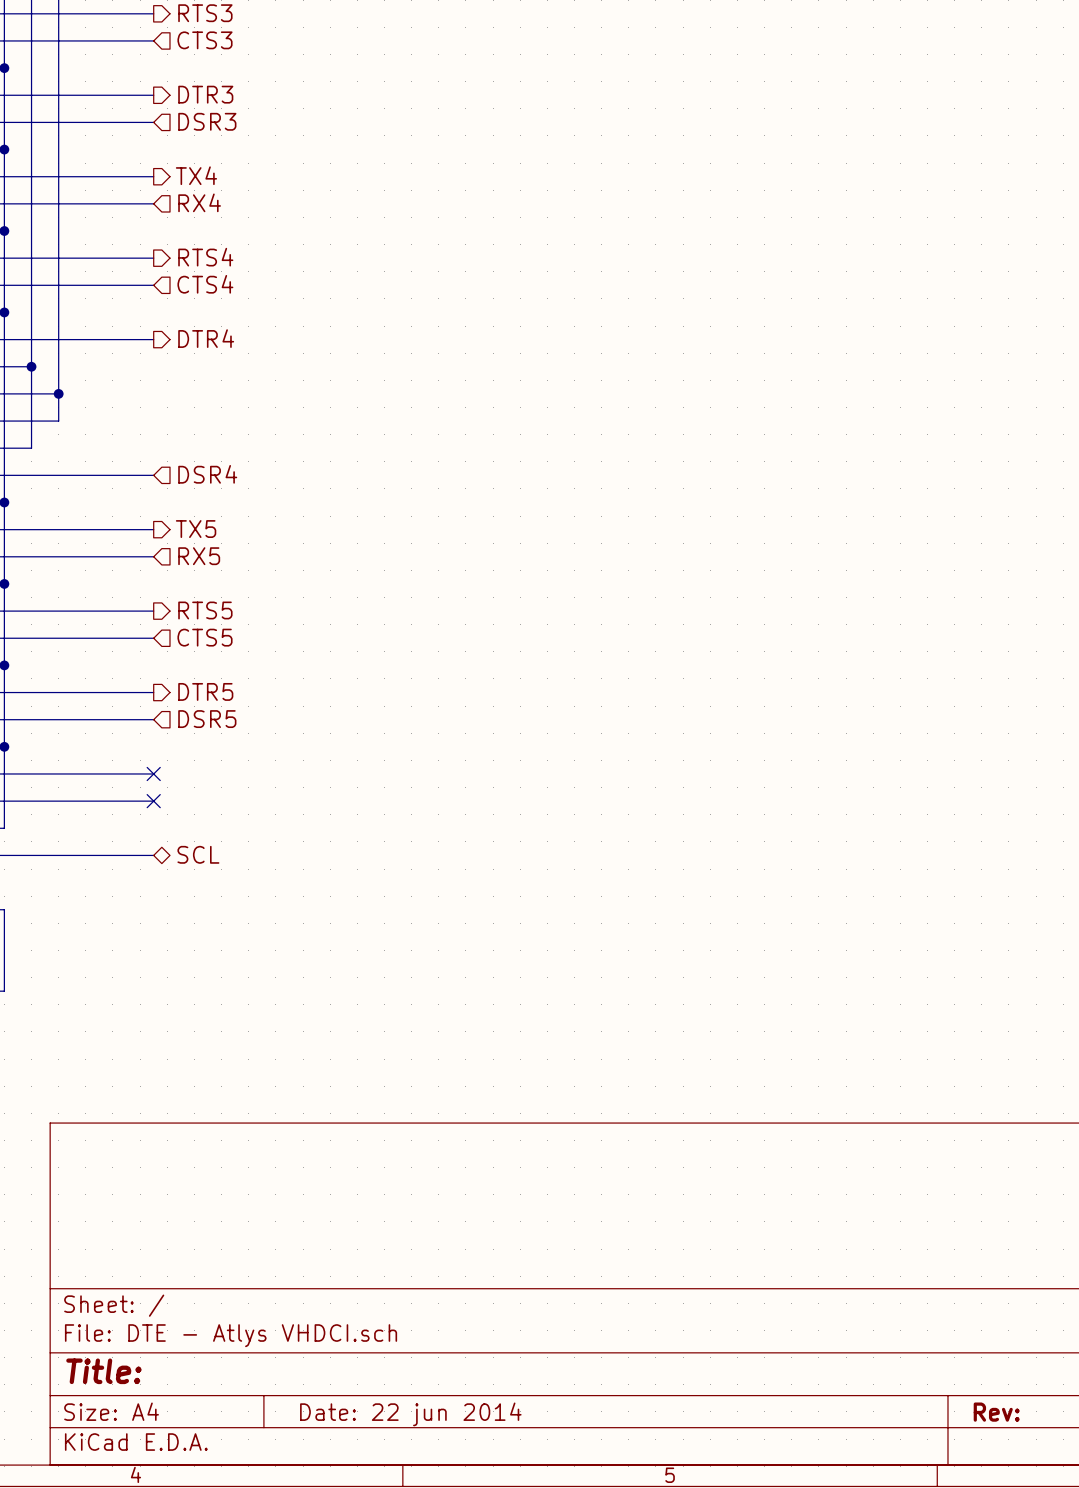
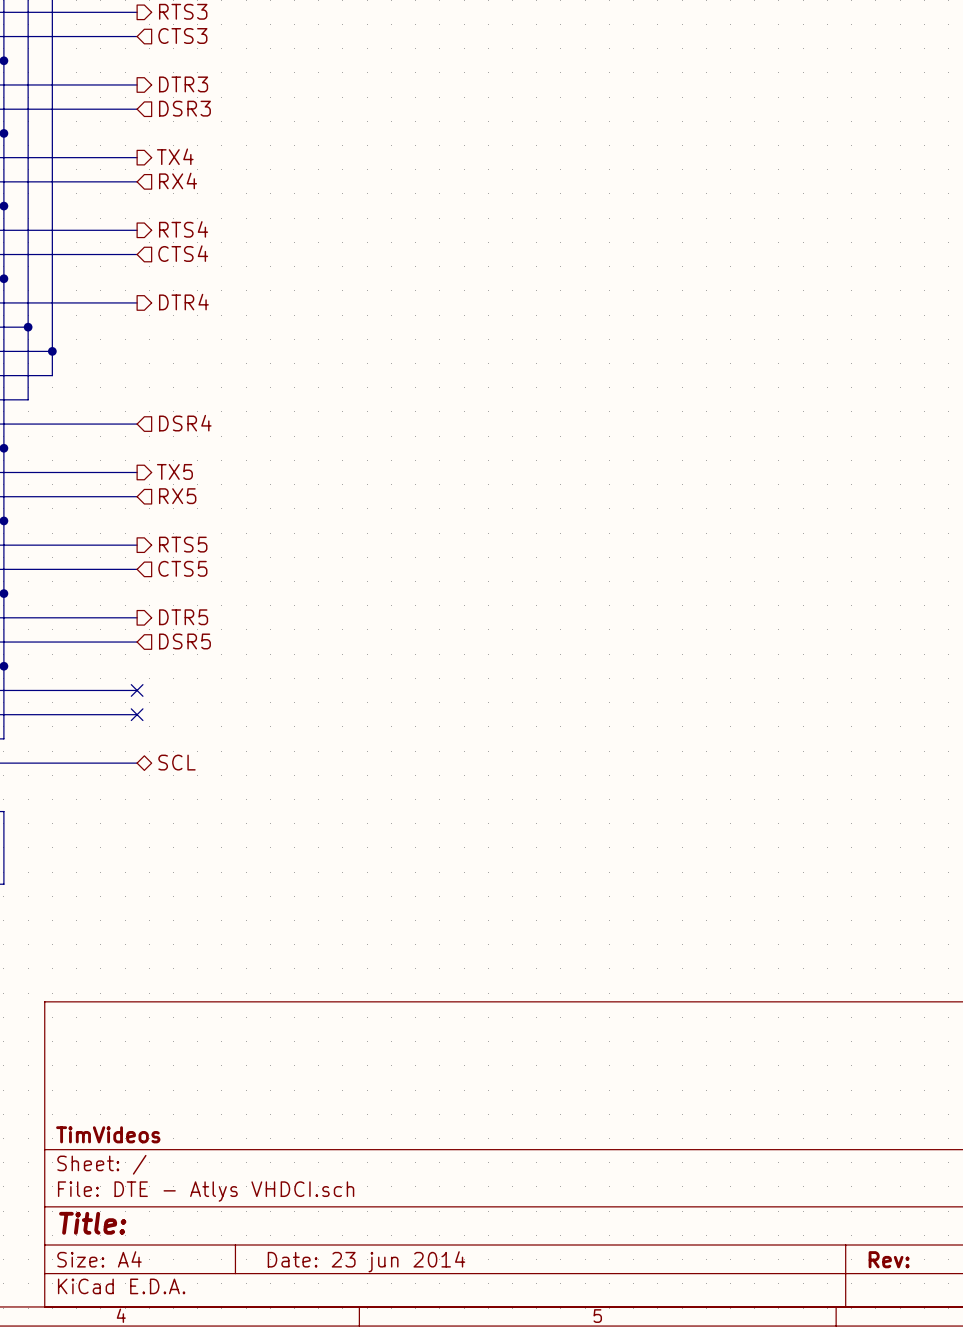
title block: none -> TimVideos (108, 1134)
title block: Date: 22 jun 2014 (410, 1414) -> Date: 23 jun 2014 (366, 1261)

